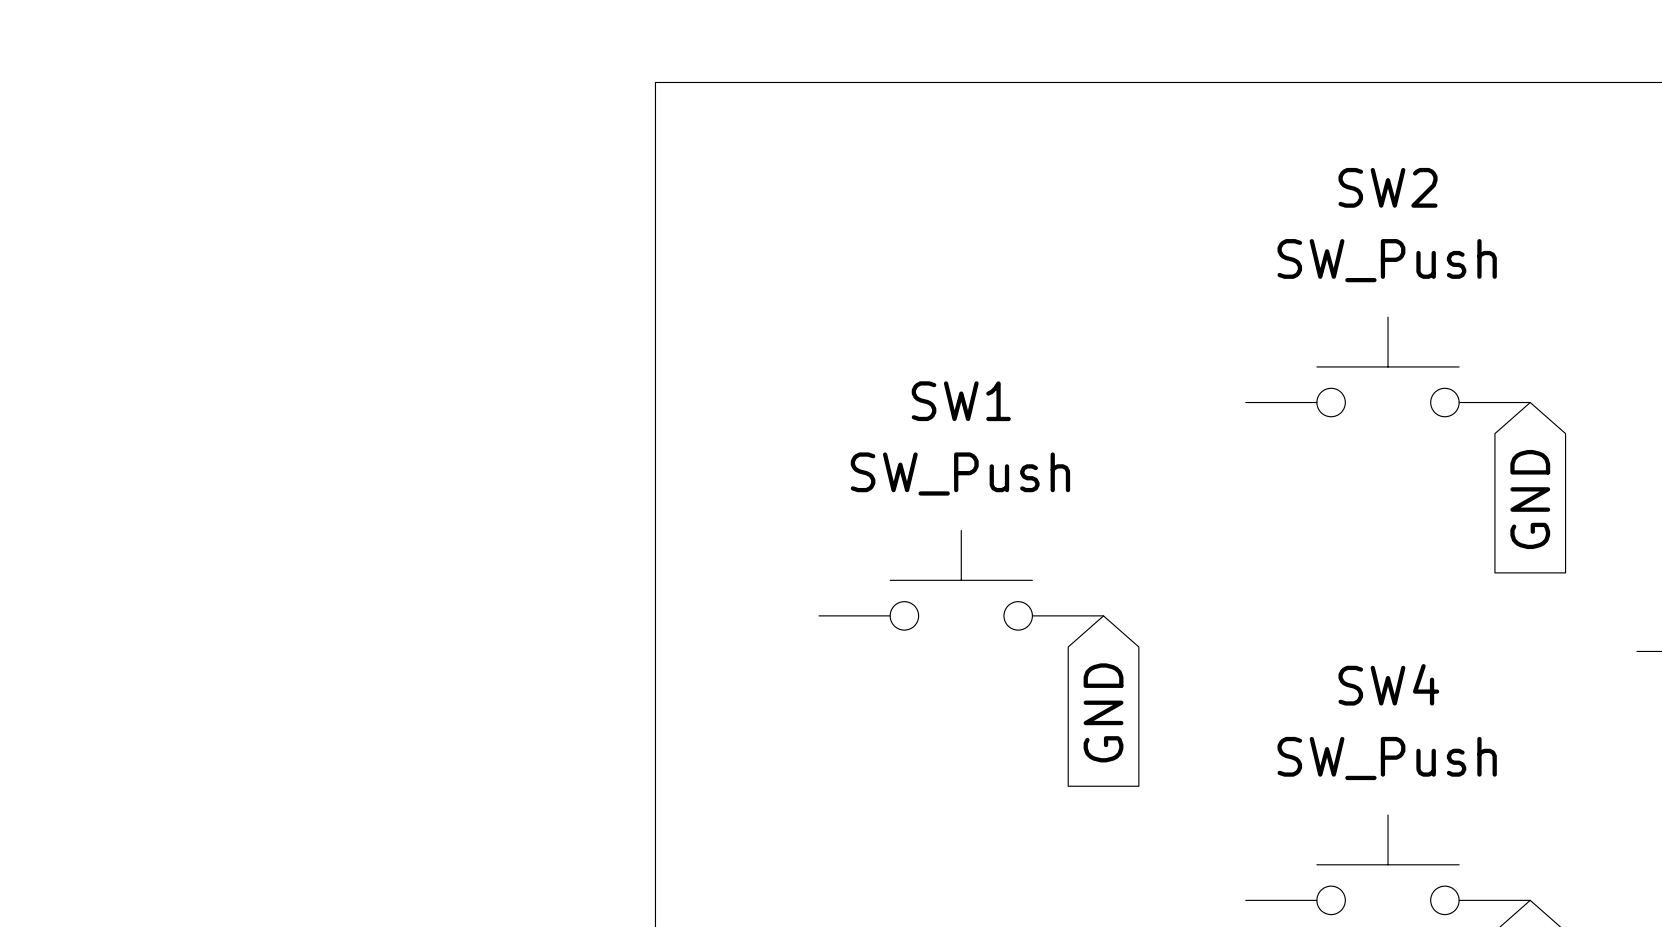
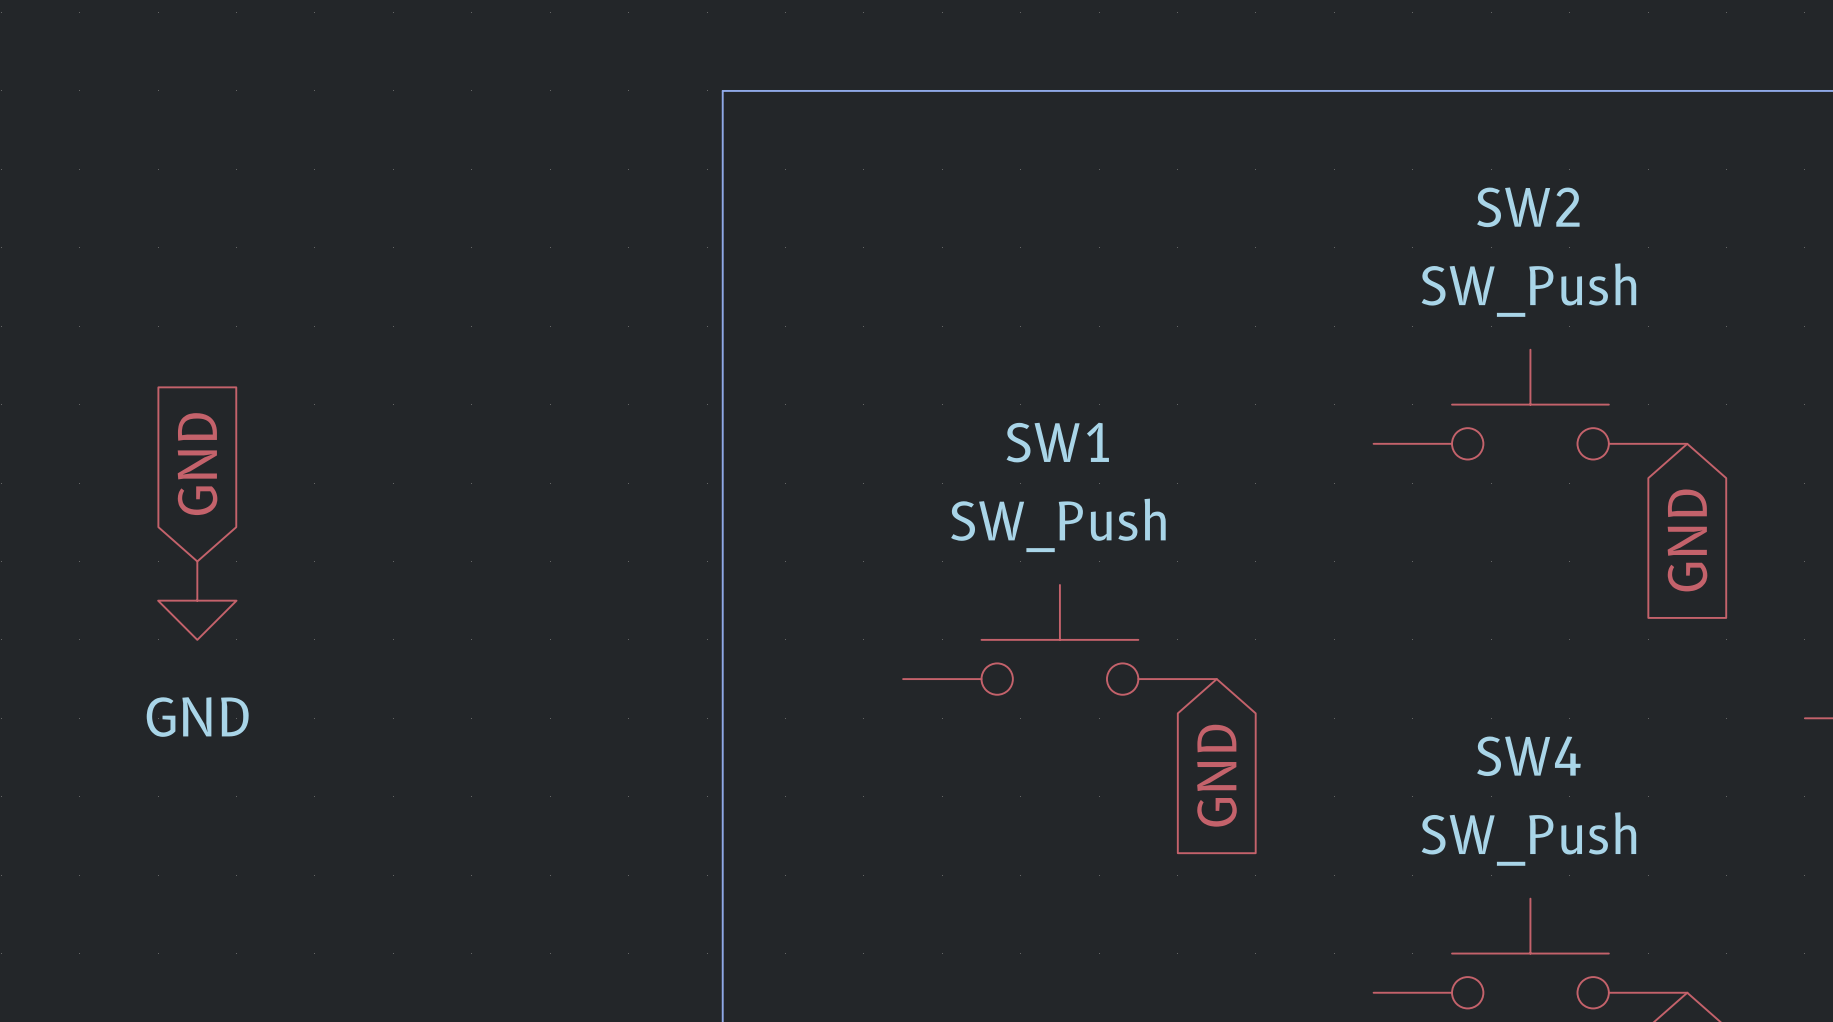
global label: none -> GND (197, 464)
power symbol: none -> GND (197, 600)

